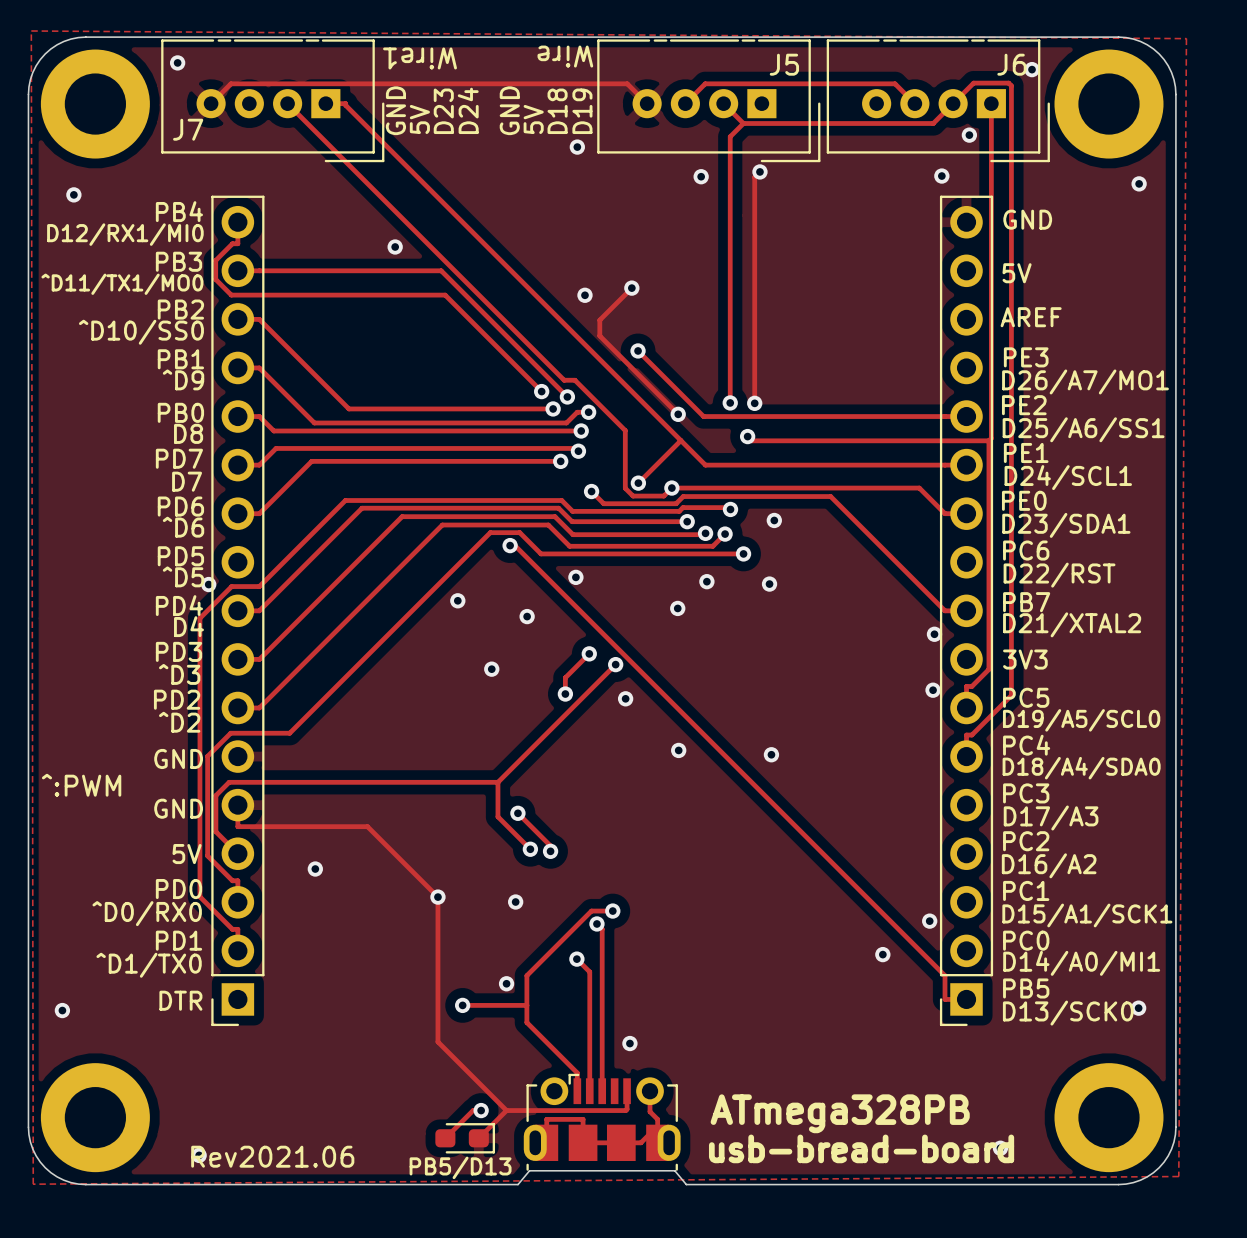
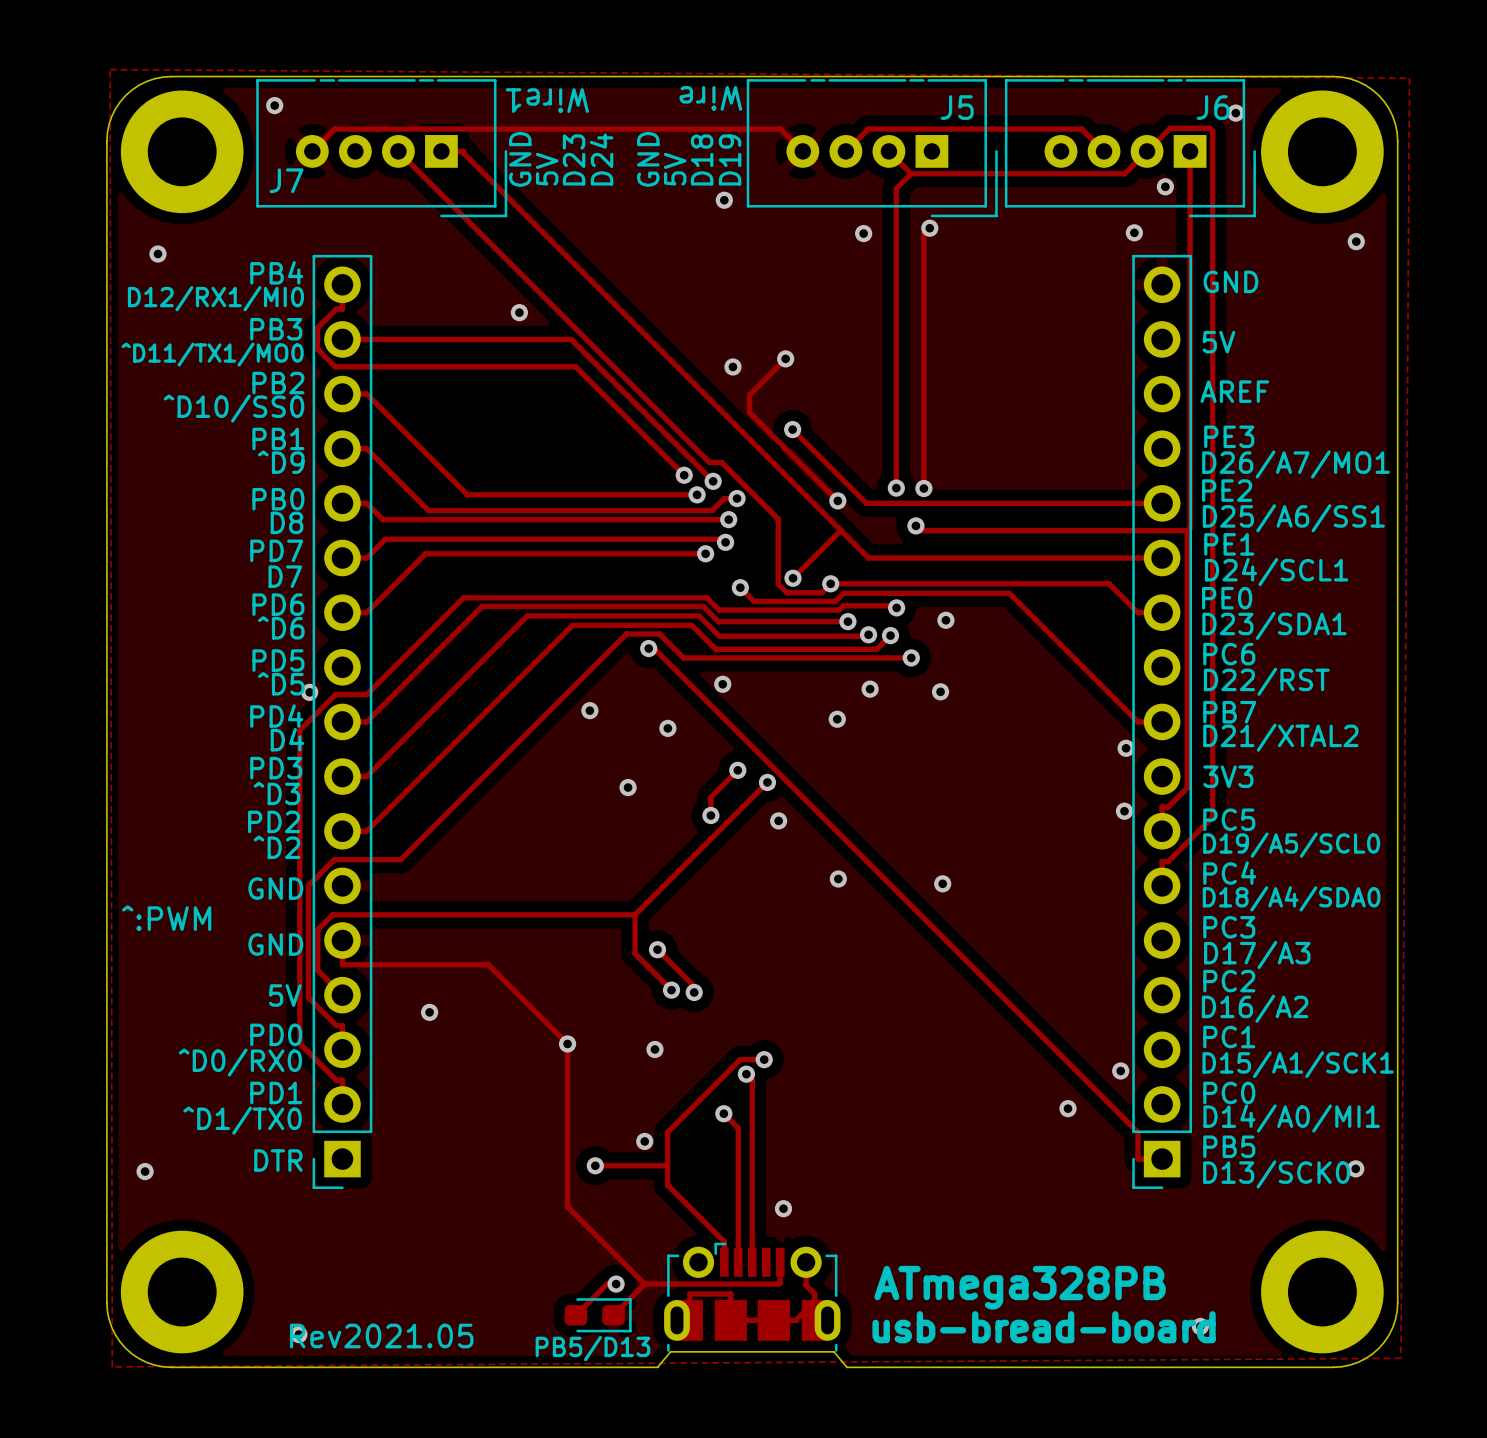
text: Rev2021.06 (272, 1156) -> Rev2021.05 (381, 1335)

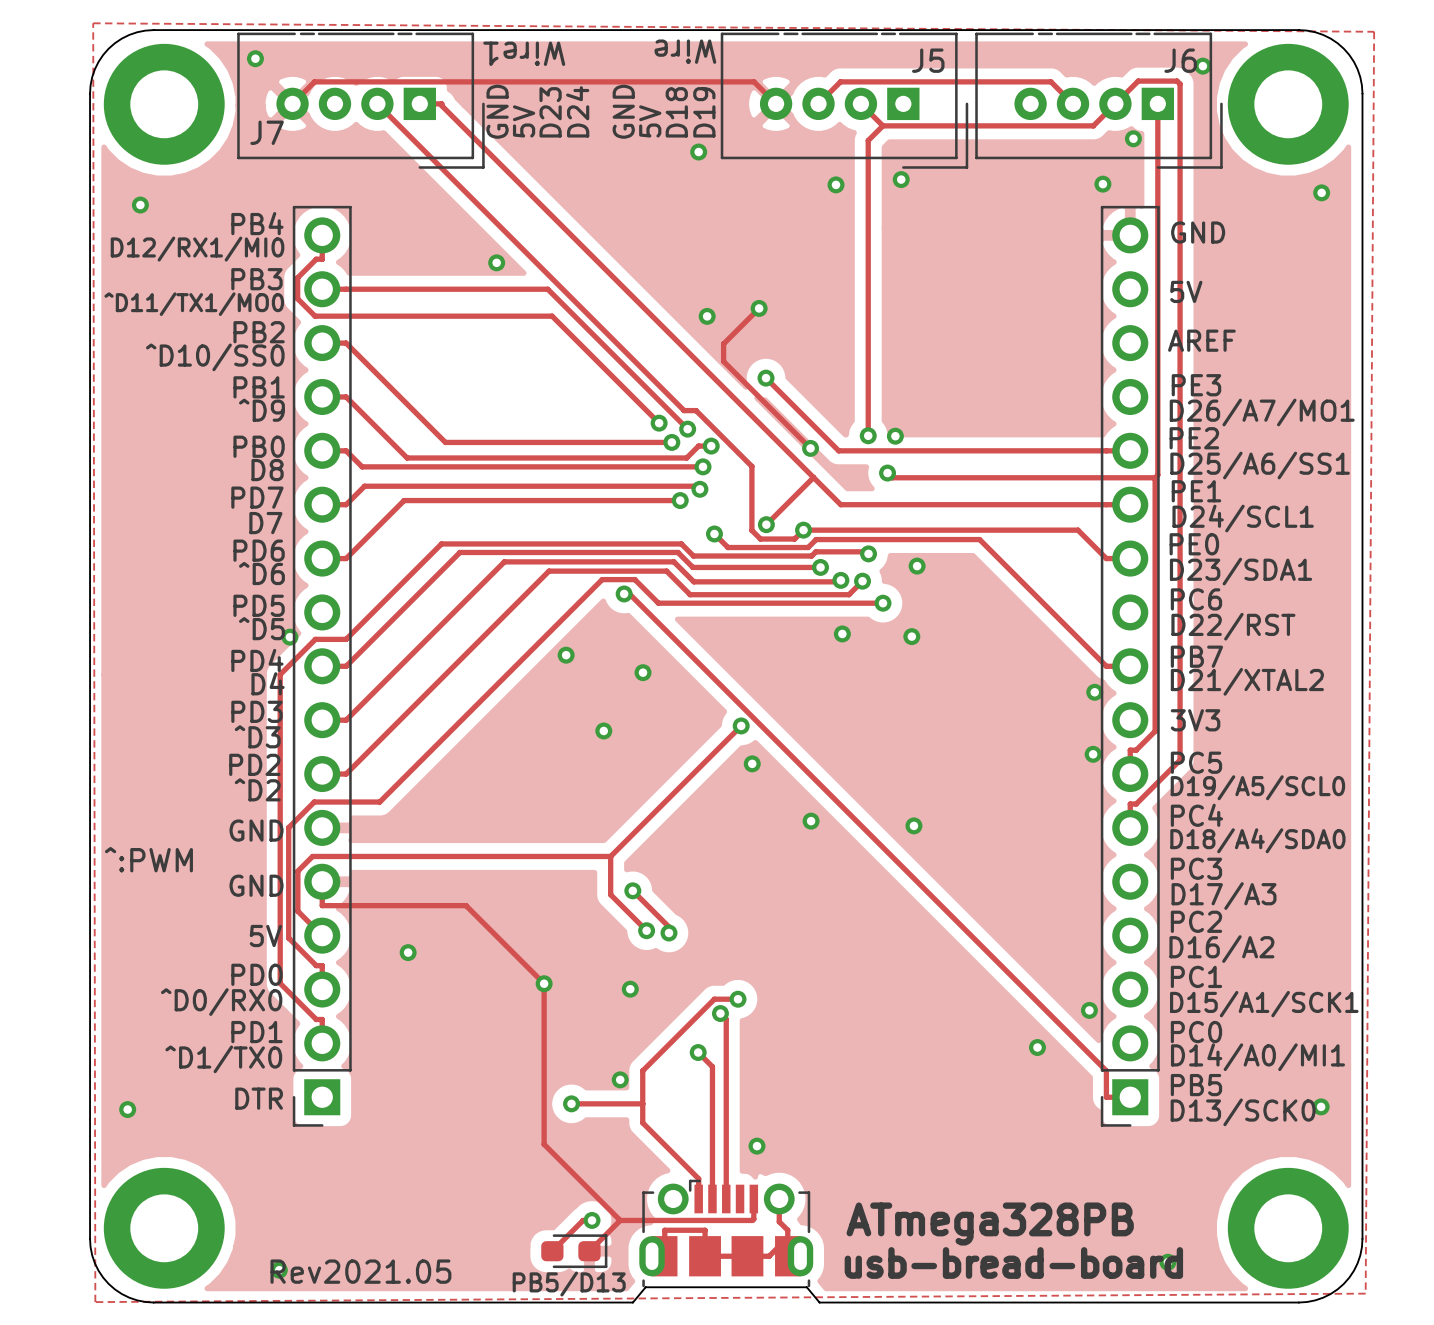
track: (929, 228) (923, 234) (923, 488) -> none
via: (722, 684) -> none
via: (837, 719) -> none
track: (737, 770) (710, 797) (710, 815) -> none
via: (737, 770) -> none
via: (710, 815) -> none

